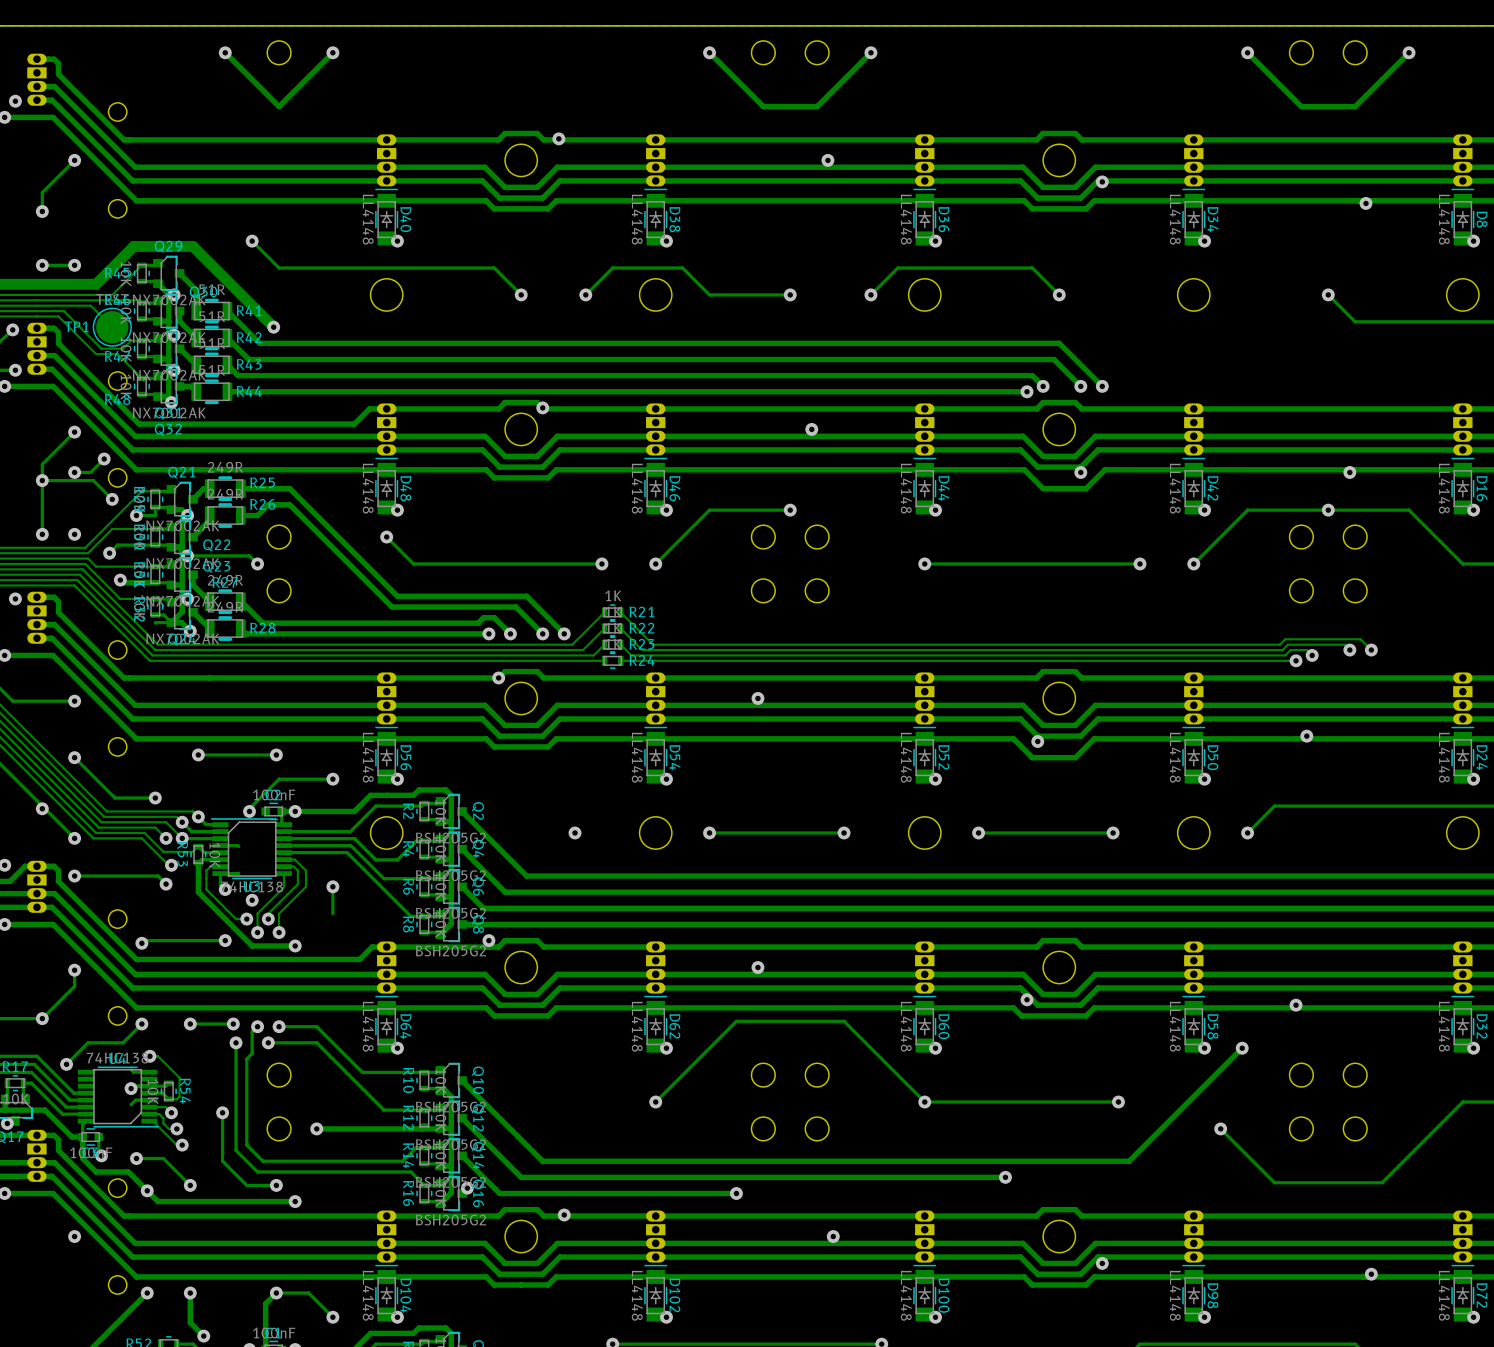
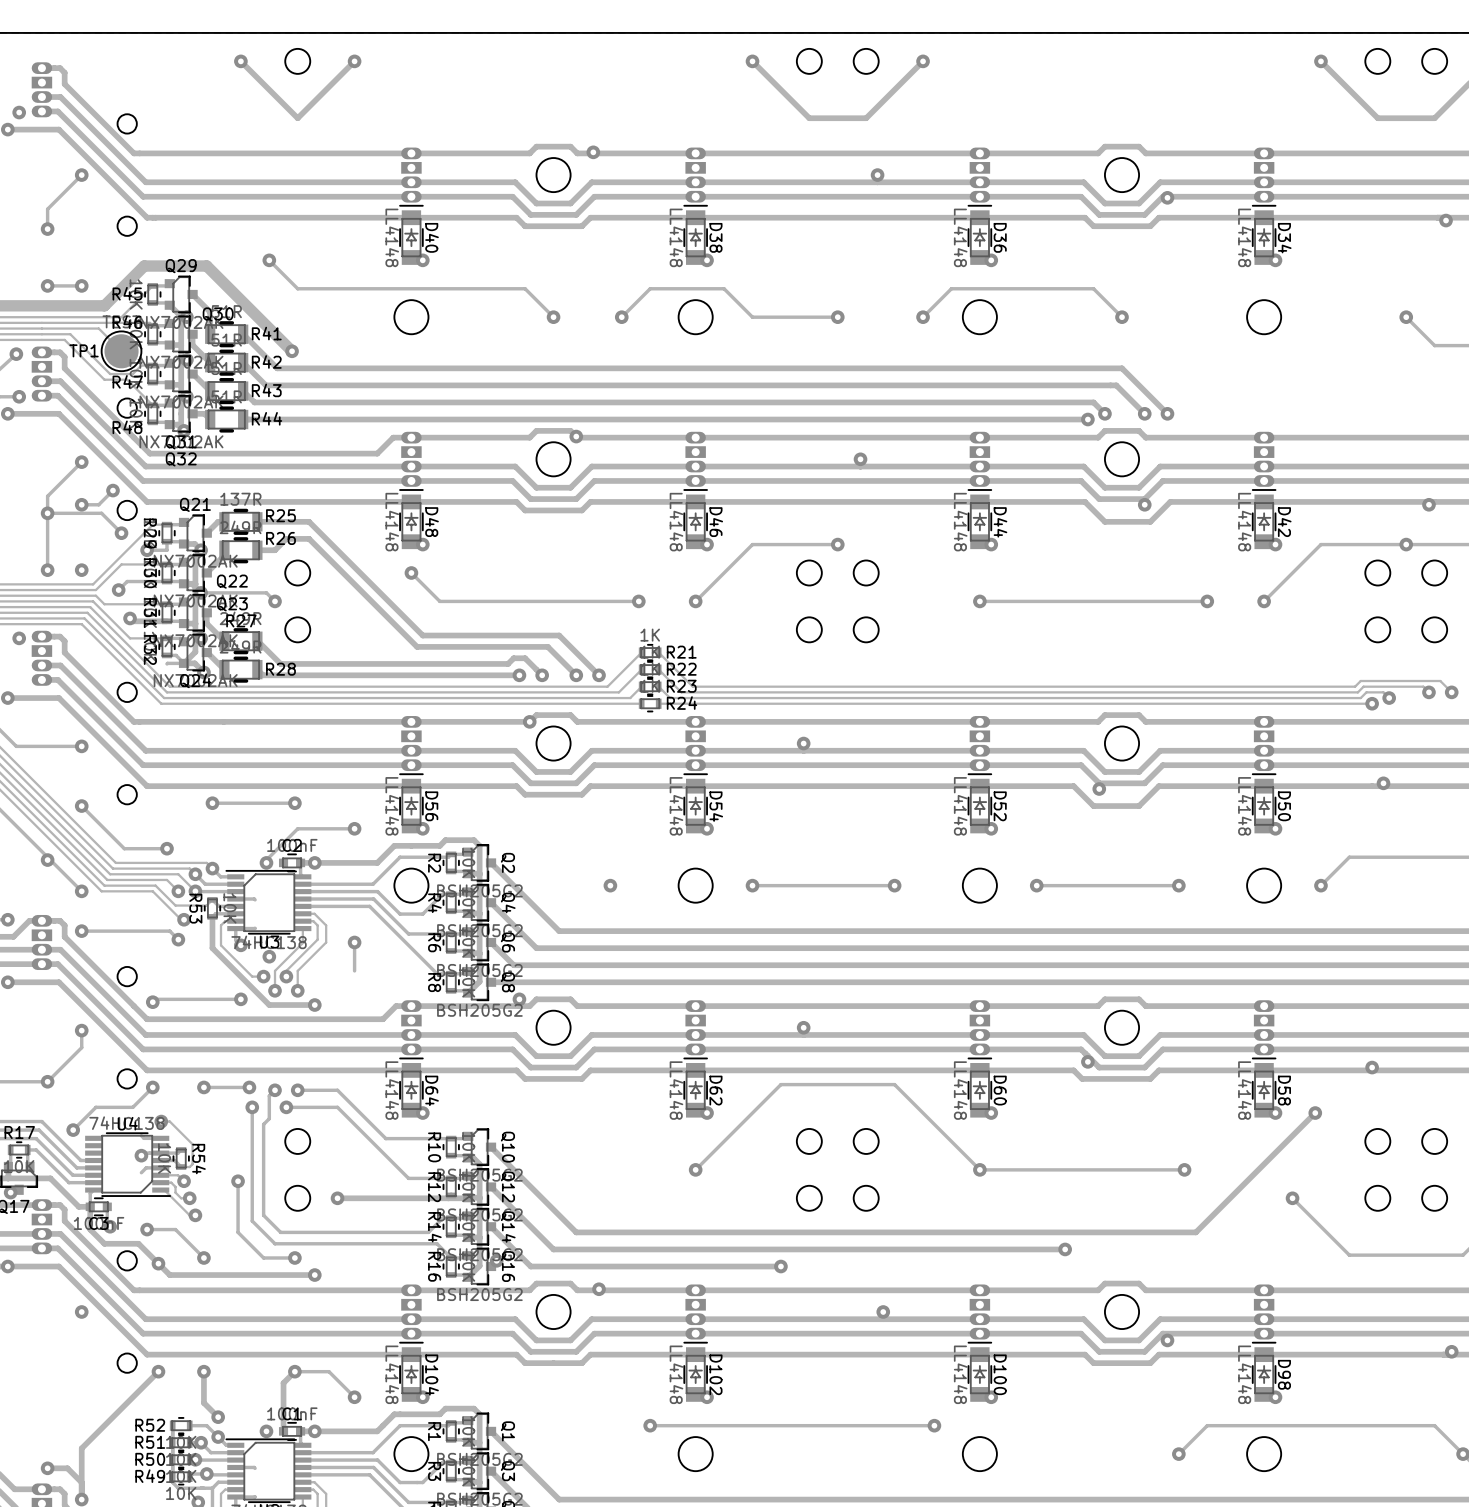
R25 value: 249R (225, 467) -> 137R (240, 499)

